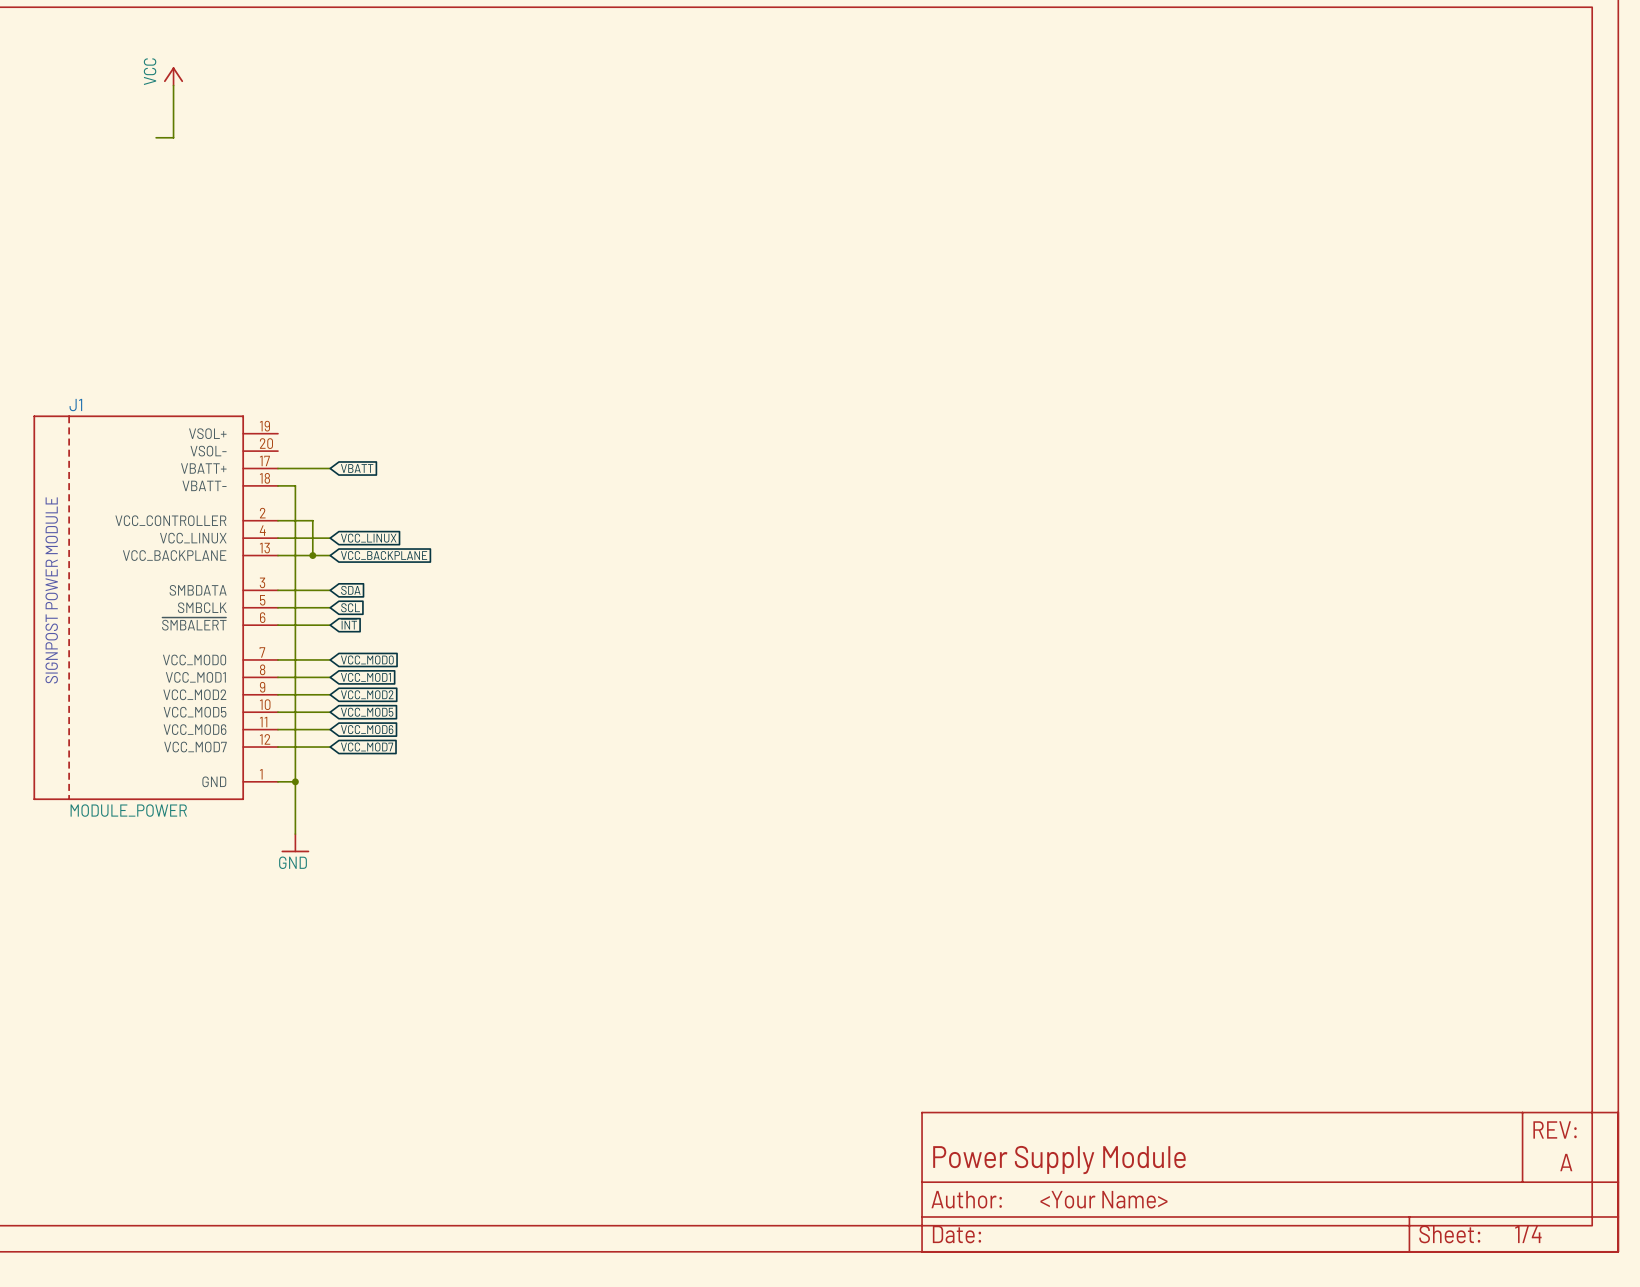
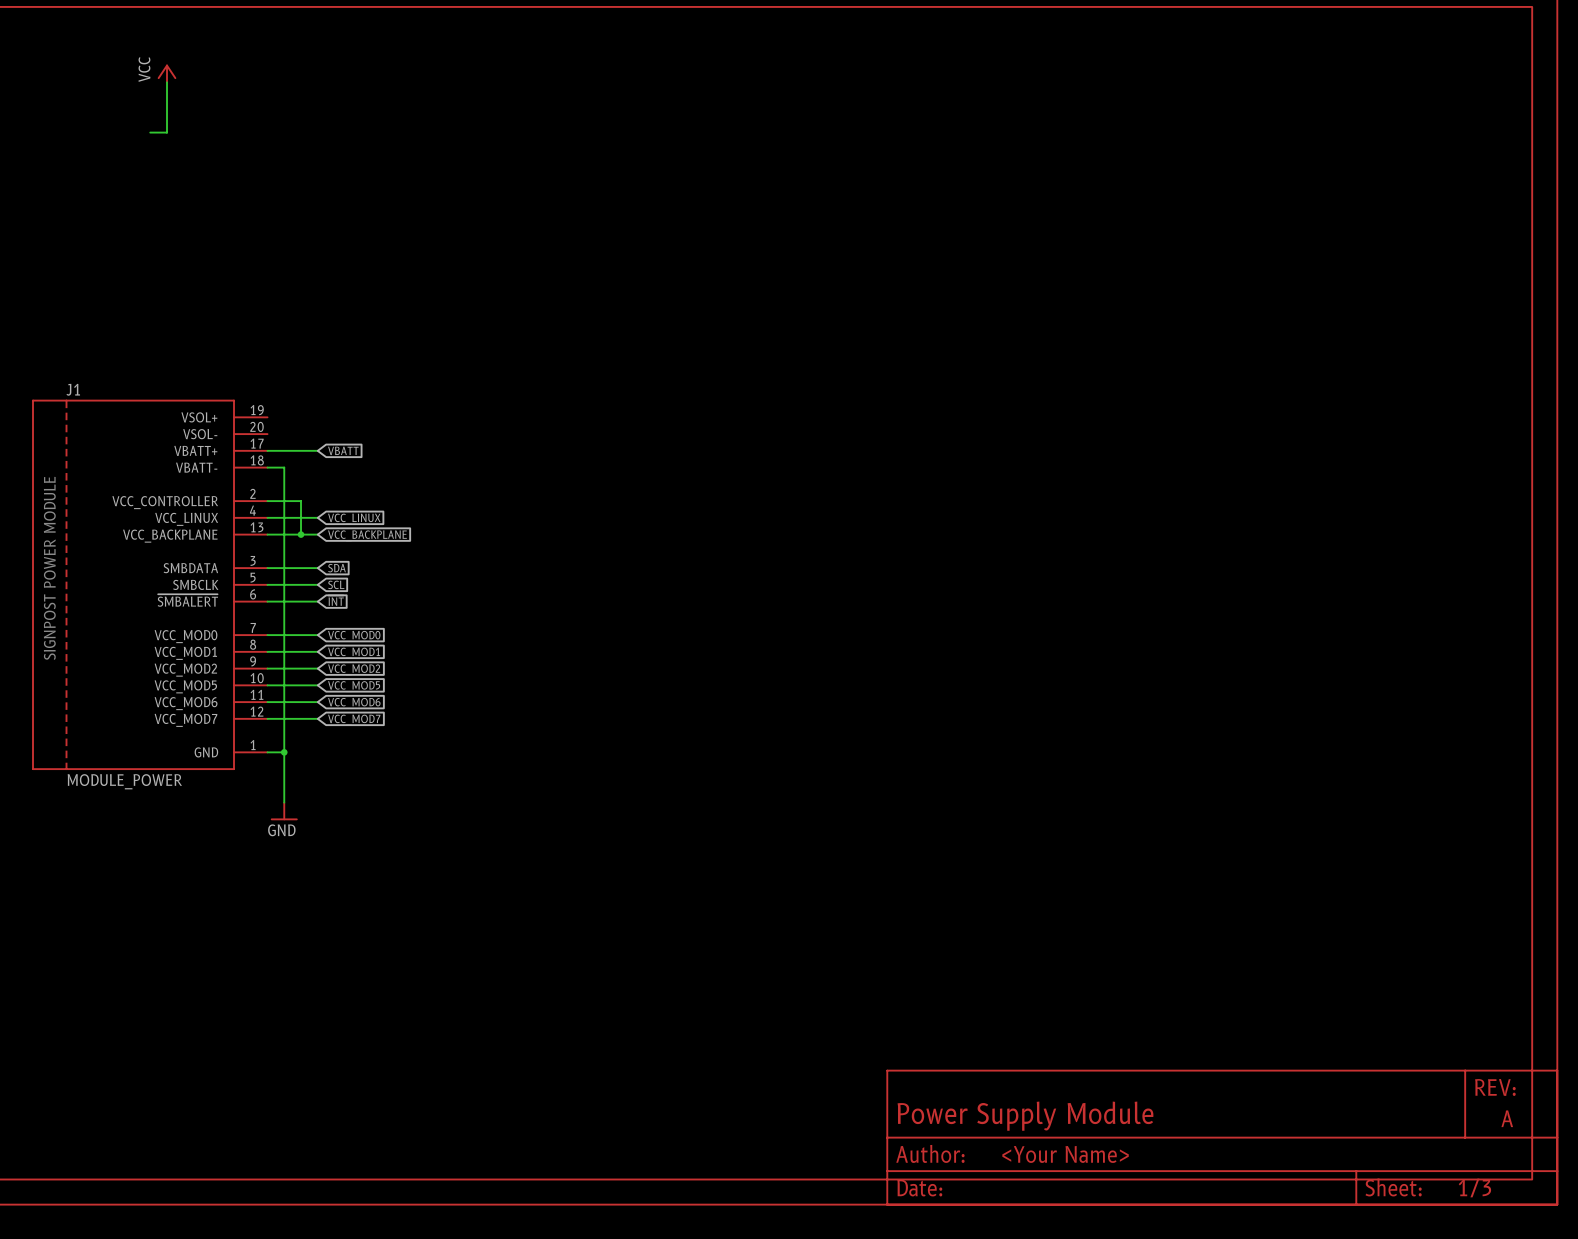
part text: 1/4 (1528, 1234) -> 1/3 (1474, 1187)

